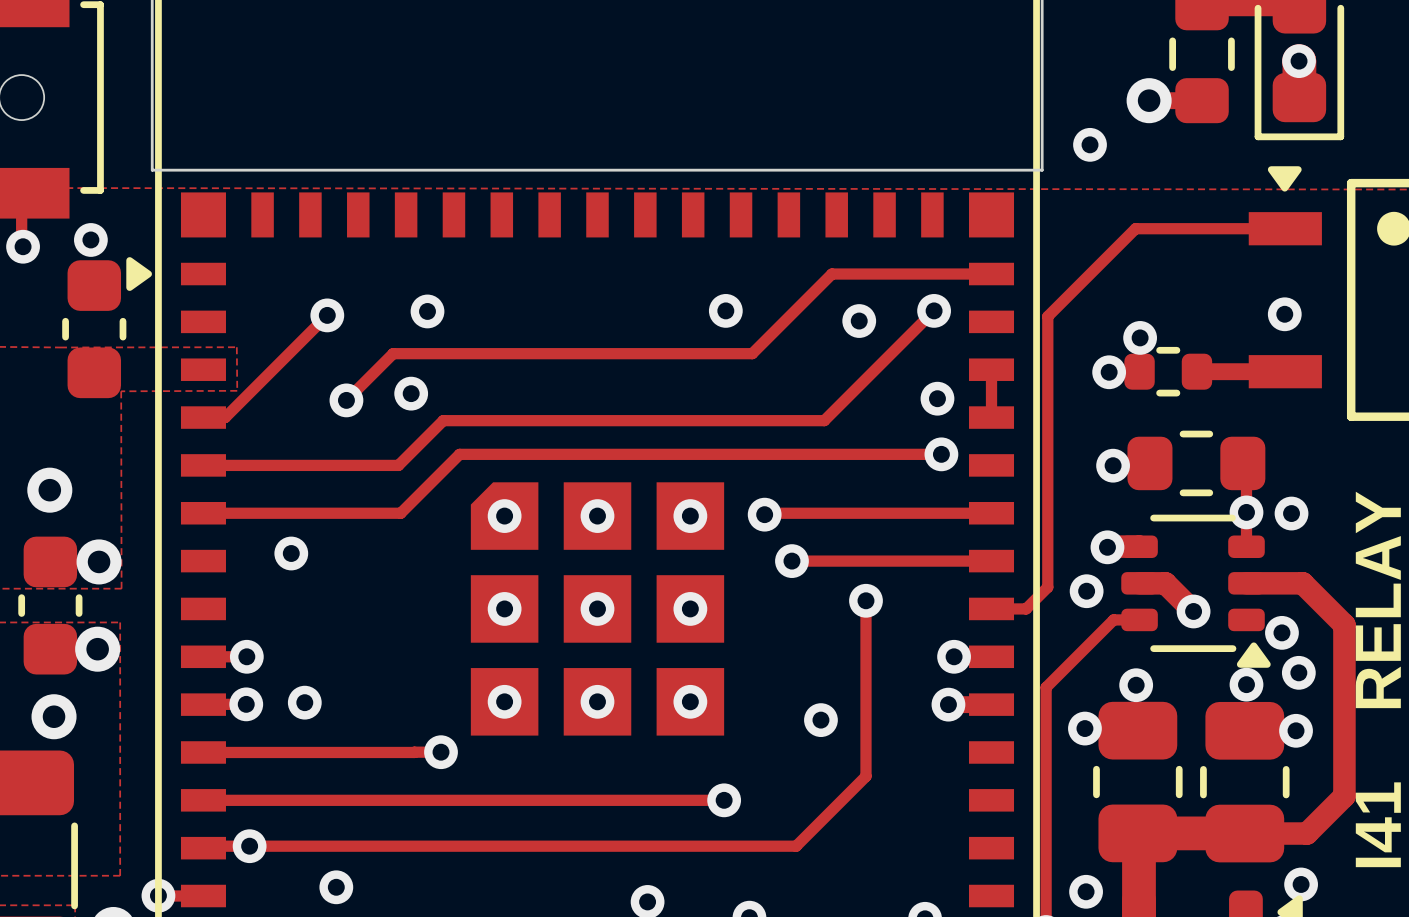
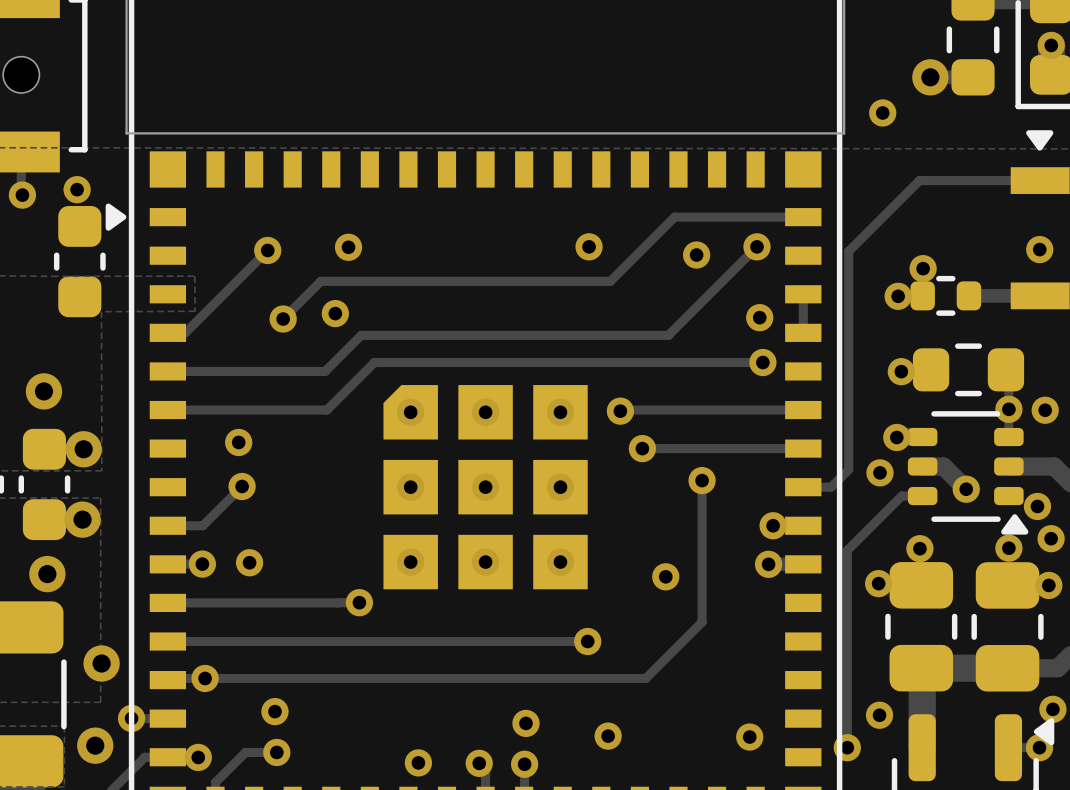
track: none -> (242, 486) (202, 525)
via position: (246, 656) -> (242, 486)
via: none -> (101, 663)

